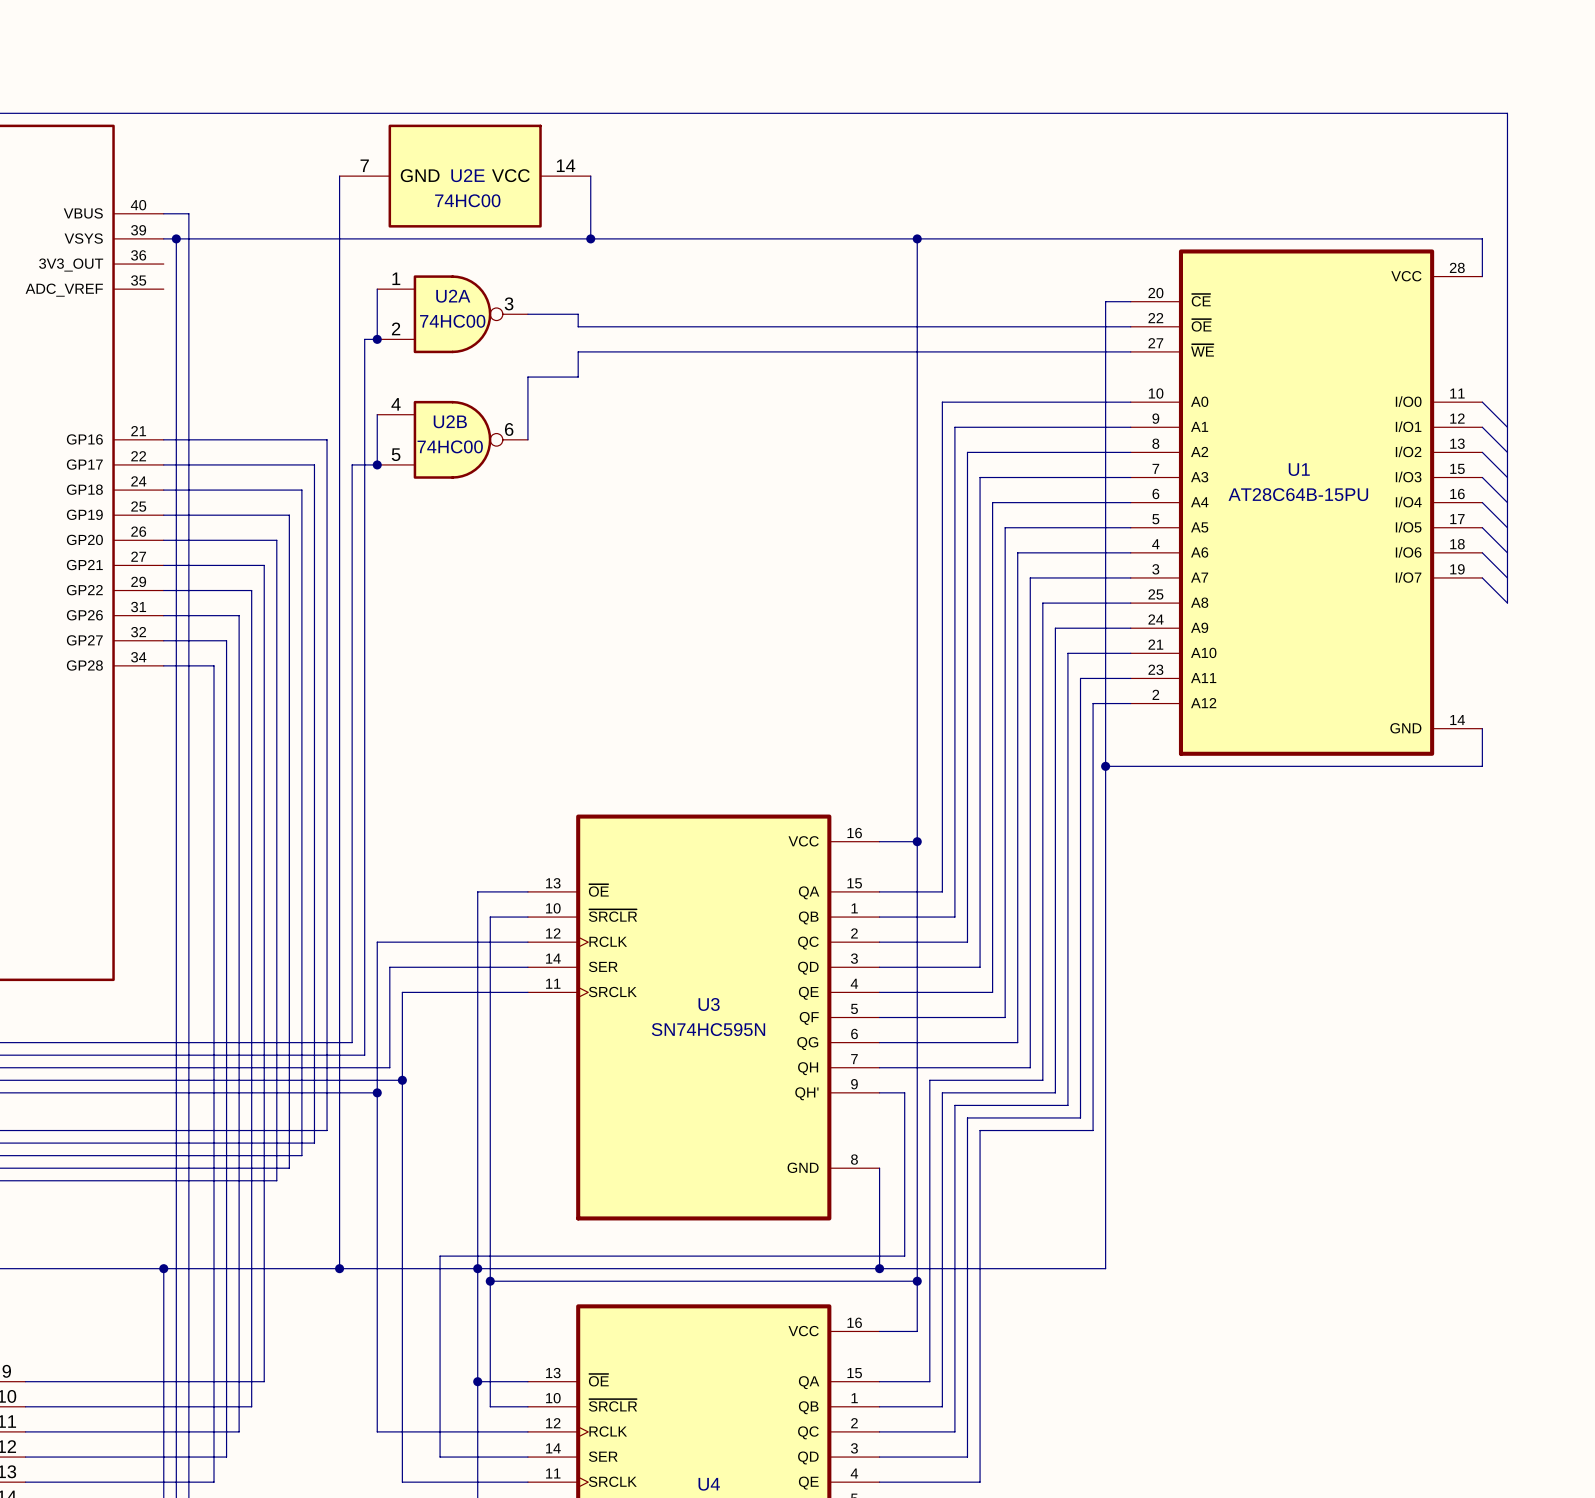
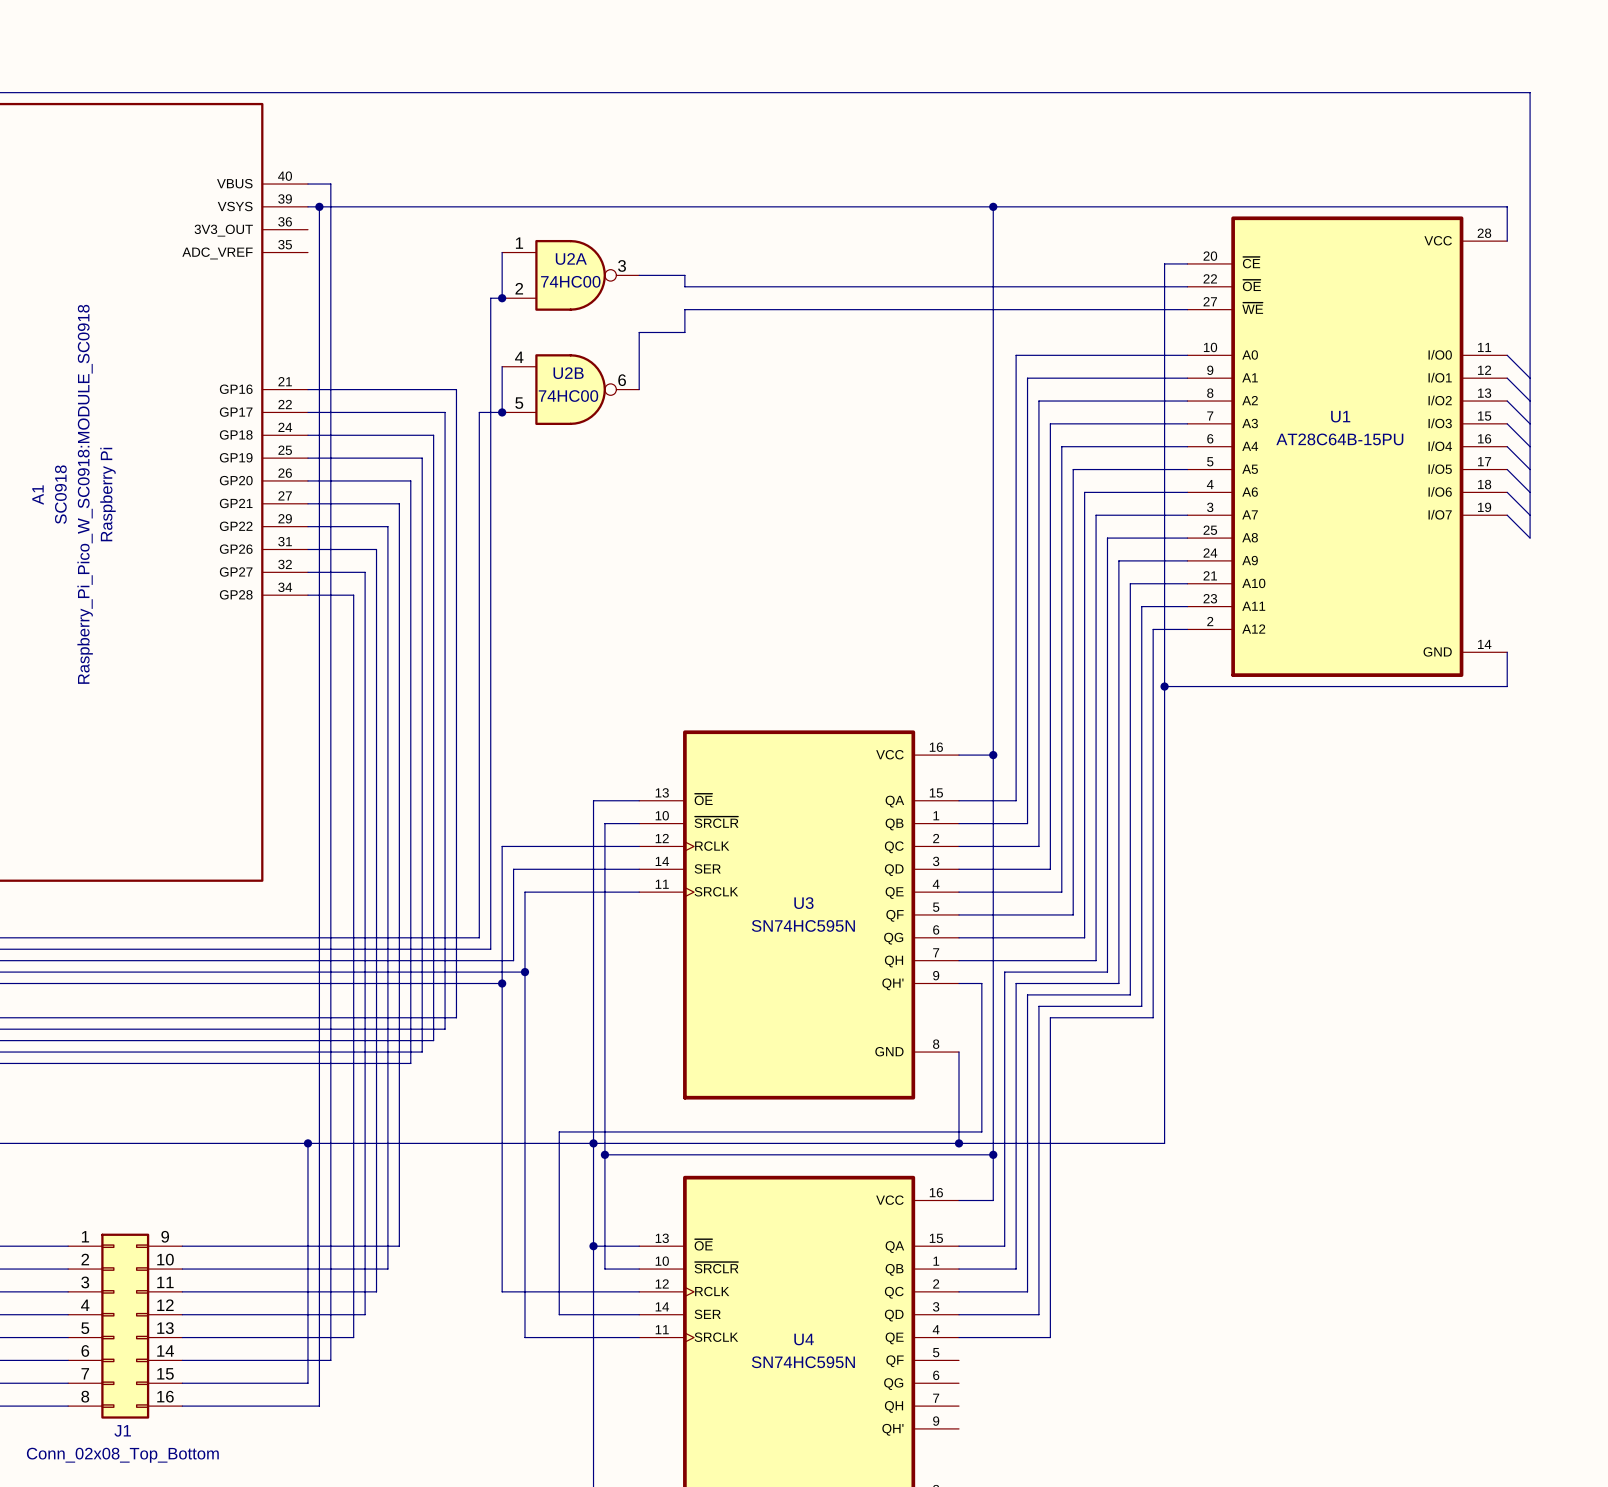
wire: (339, 176) (339, 1268) -> none
U2E: 74HC00 (465, 176) -> none
wire: (590, 176) (590, 238) -> none
junction: (590, 238) -> none
junction: (339, 1268) -> none

